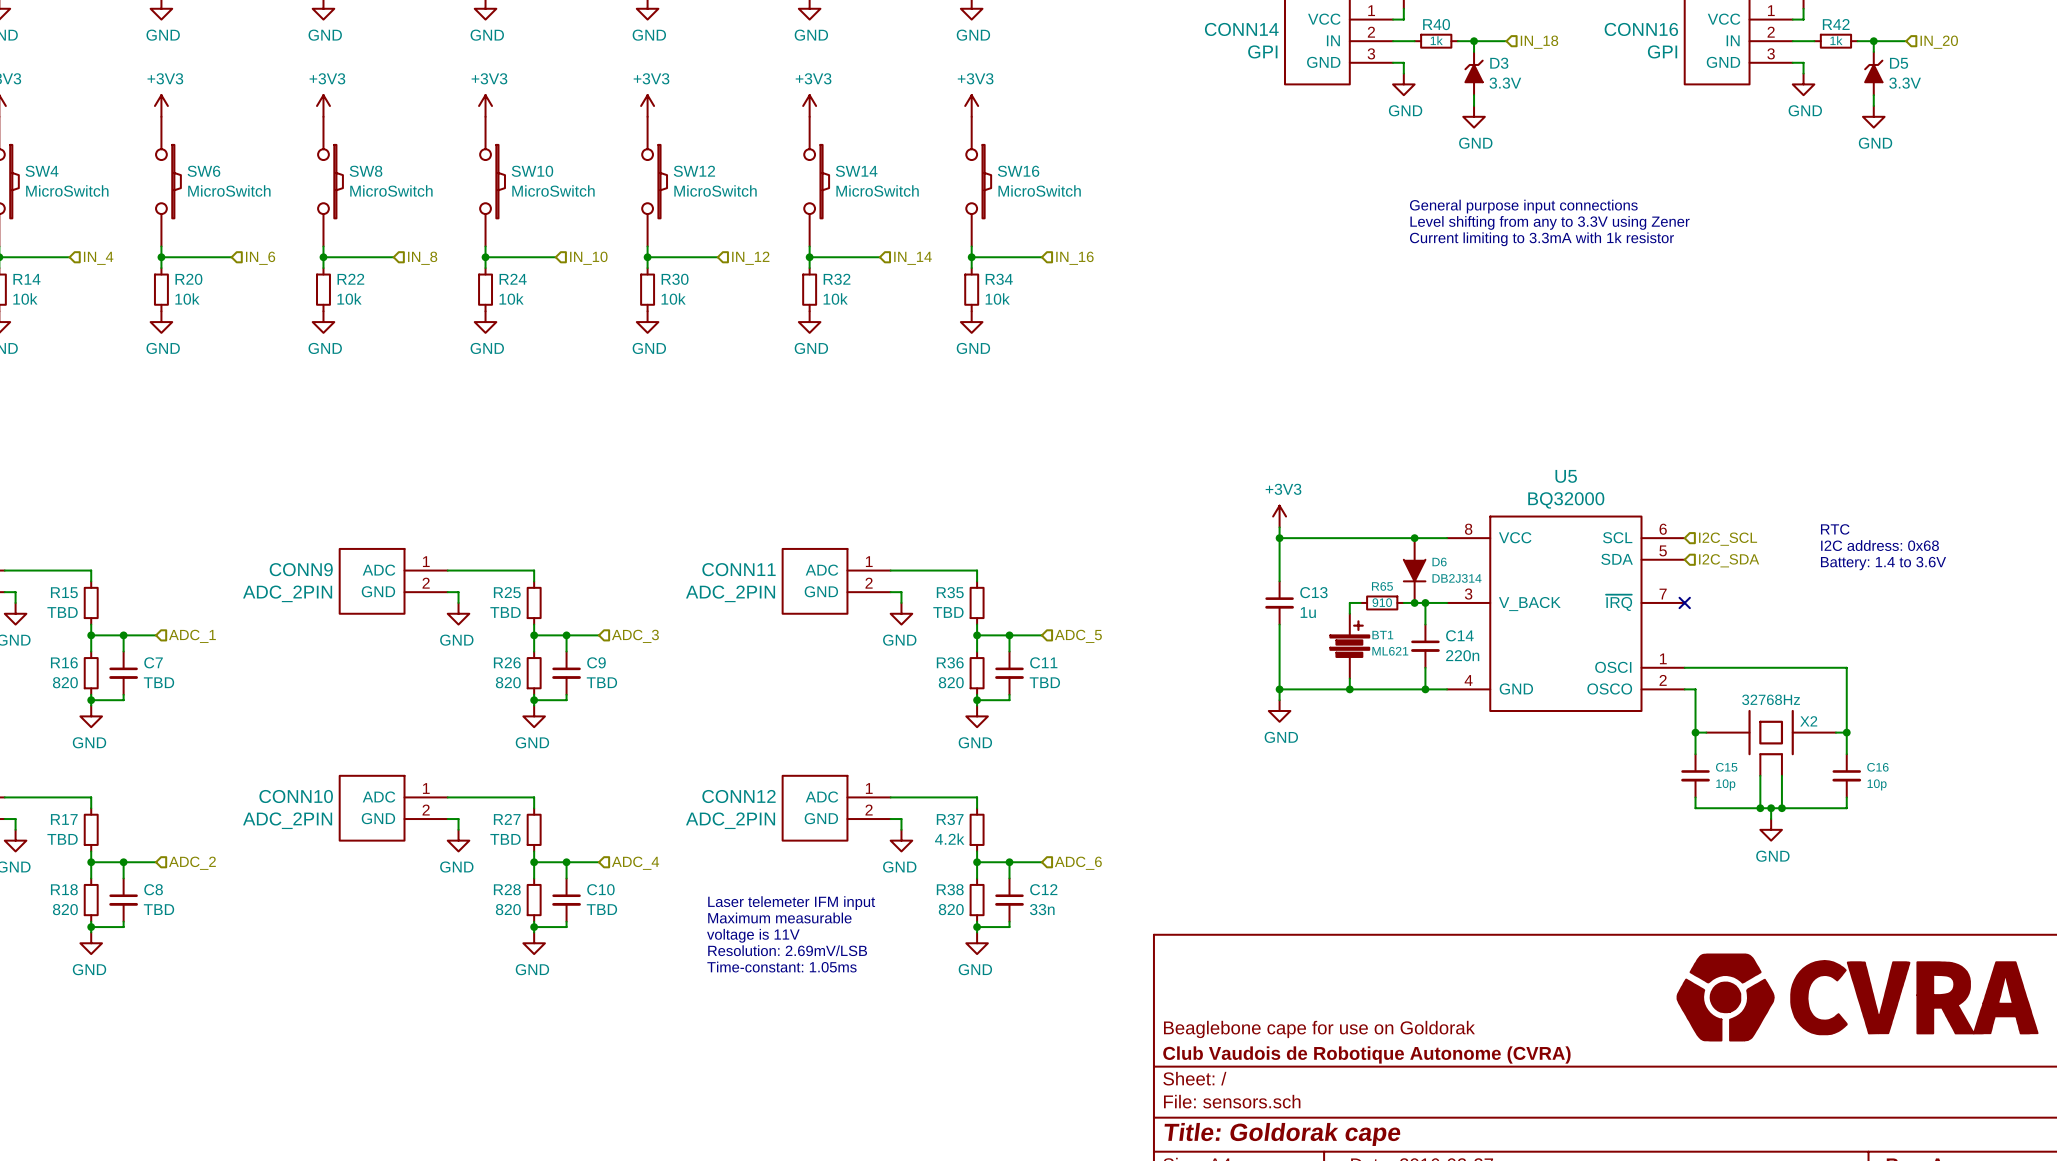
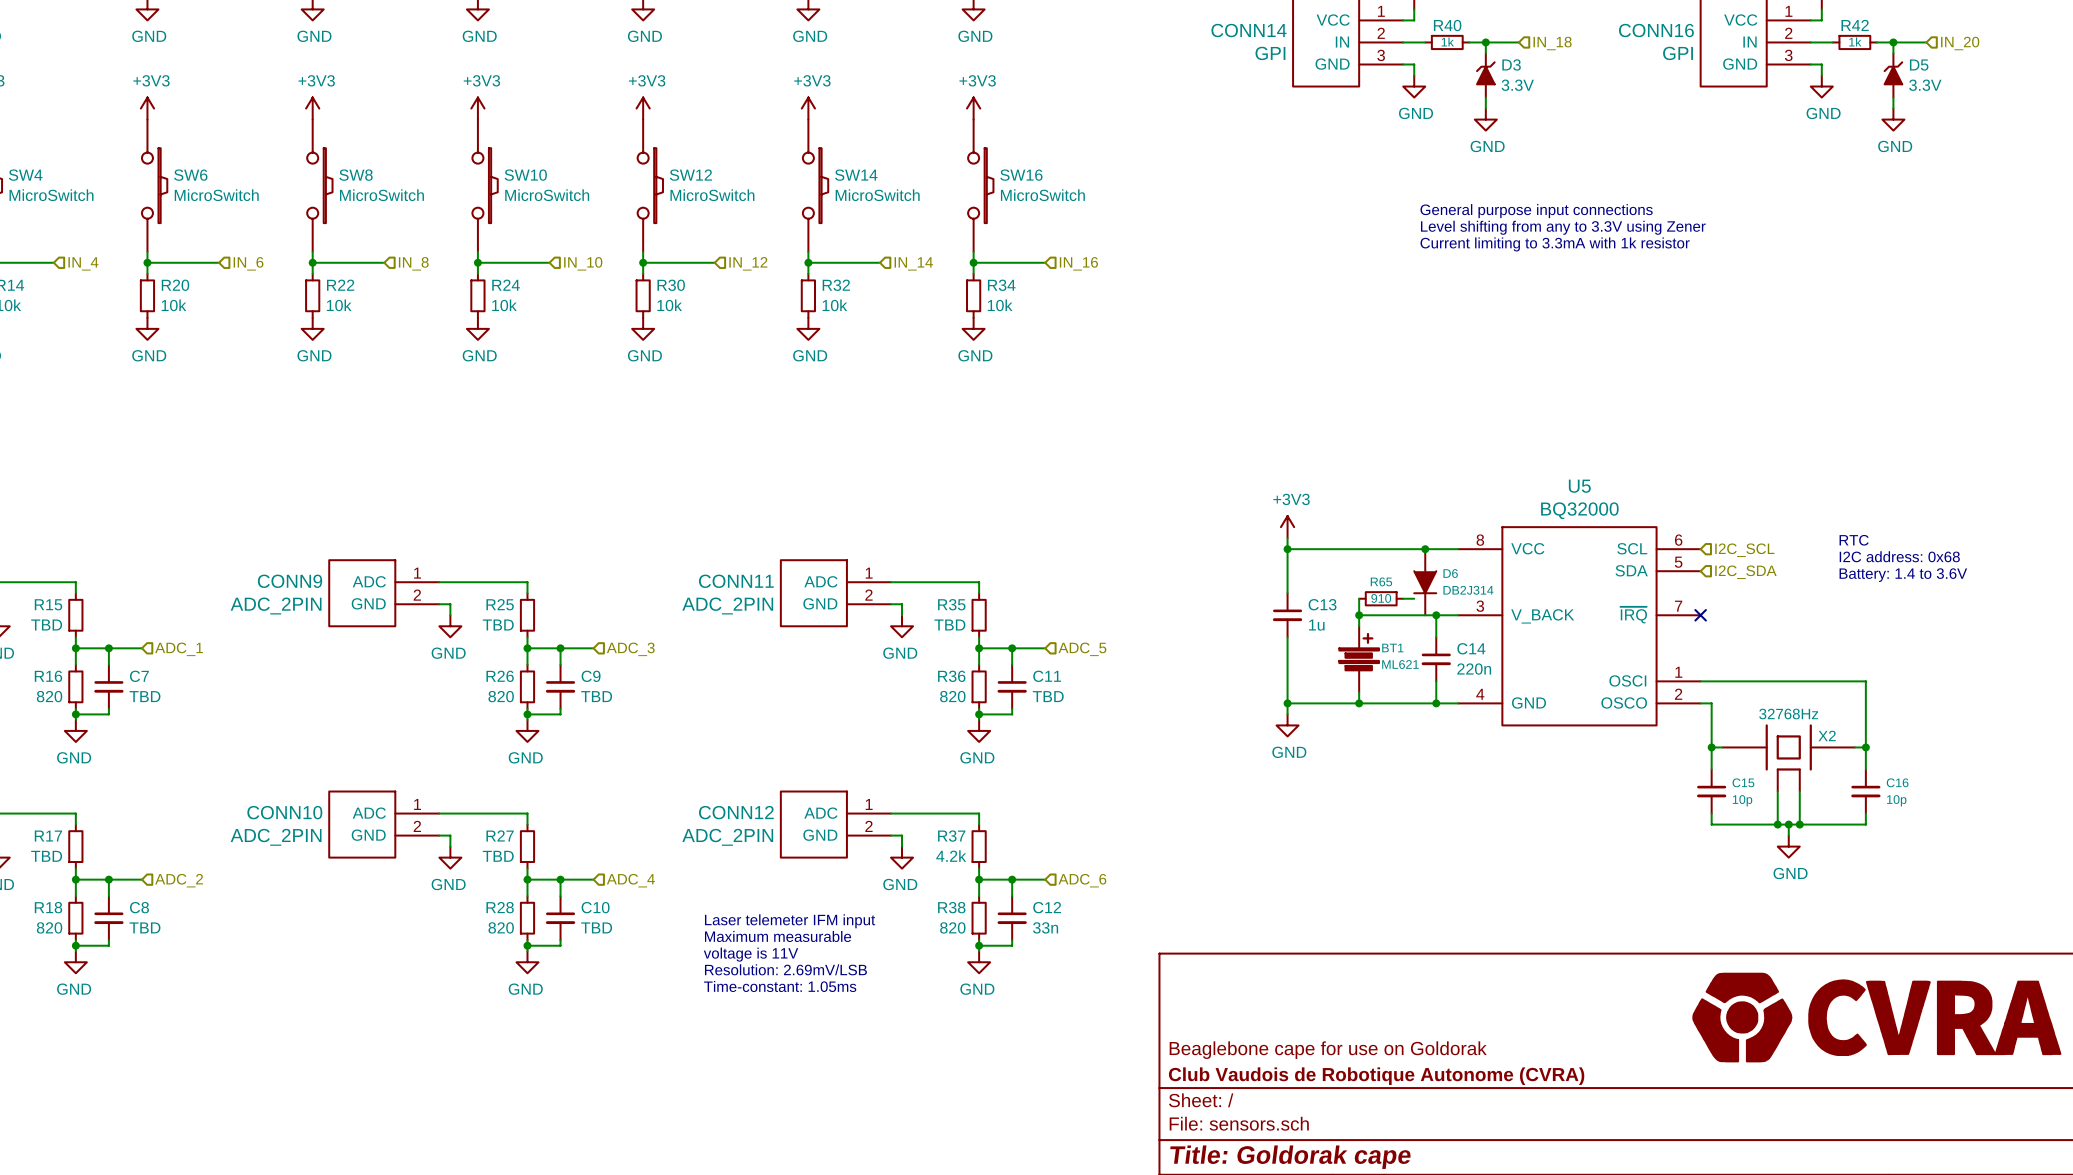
wire: none -> (1359, 598) (1359, 615)
wire: none -> (1403, 598) (1414, 598)
junction: none -> (1359, 615)
R65 position: (1382, 602) -> (1381, 598)
junction: (1414, 602) -> none

